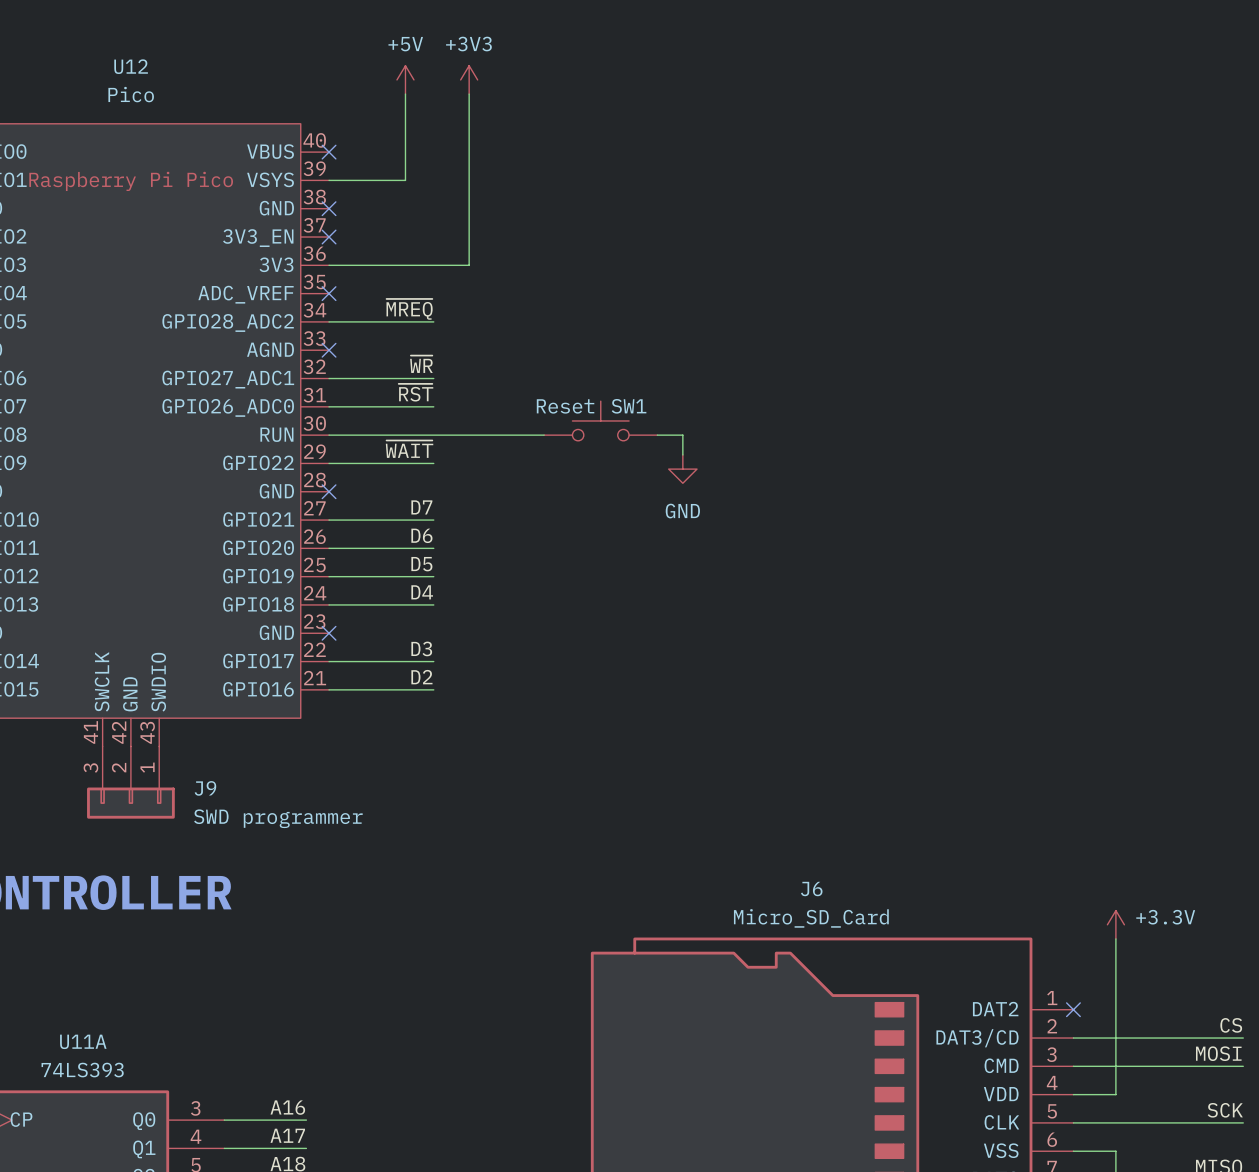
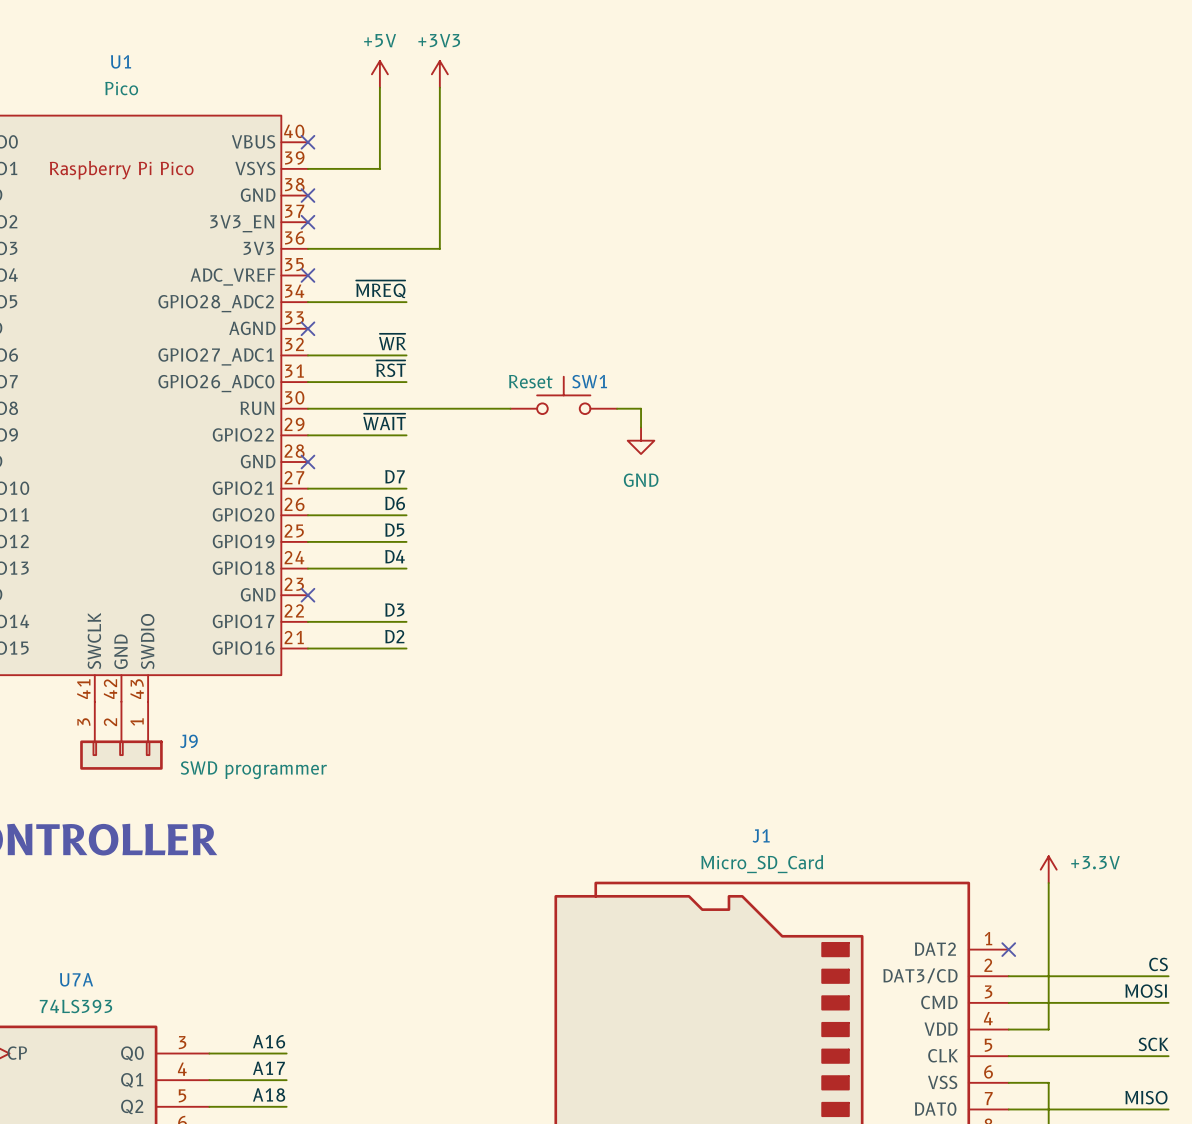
U12 name: U12 (131, 66) -> U1 (121, 61)
J6 name: J6 (811, 889) -> J1 (761, 835)
U11A name: U11A (83, 1041) -> U7A (76, 979)

